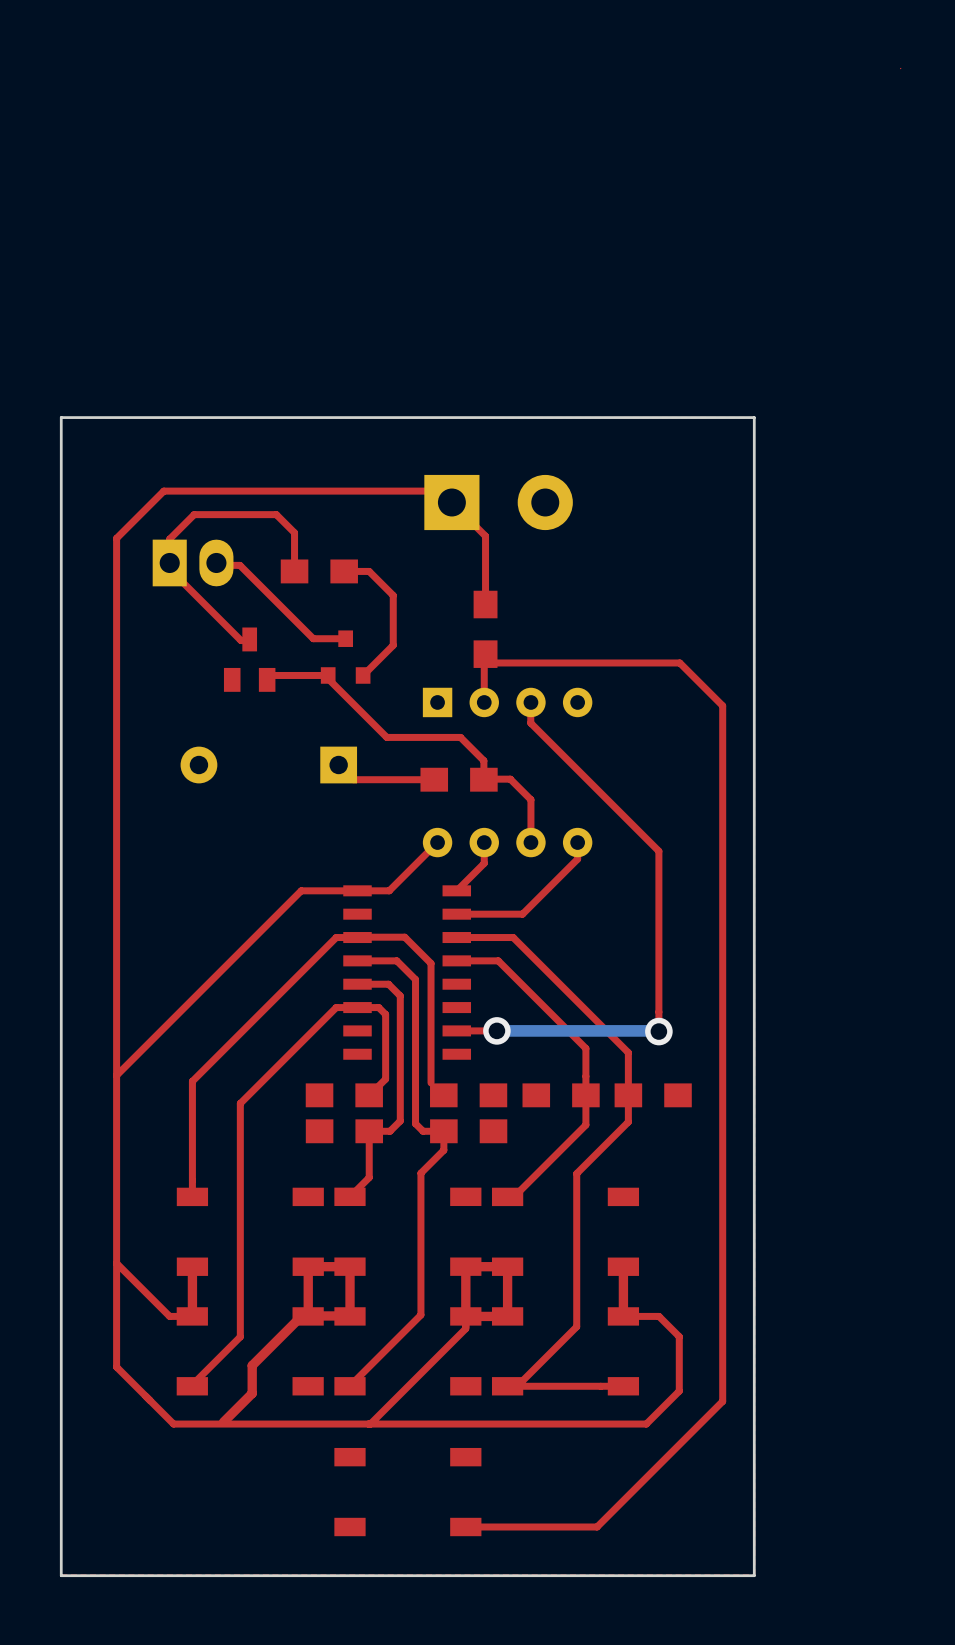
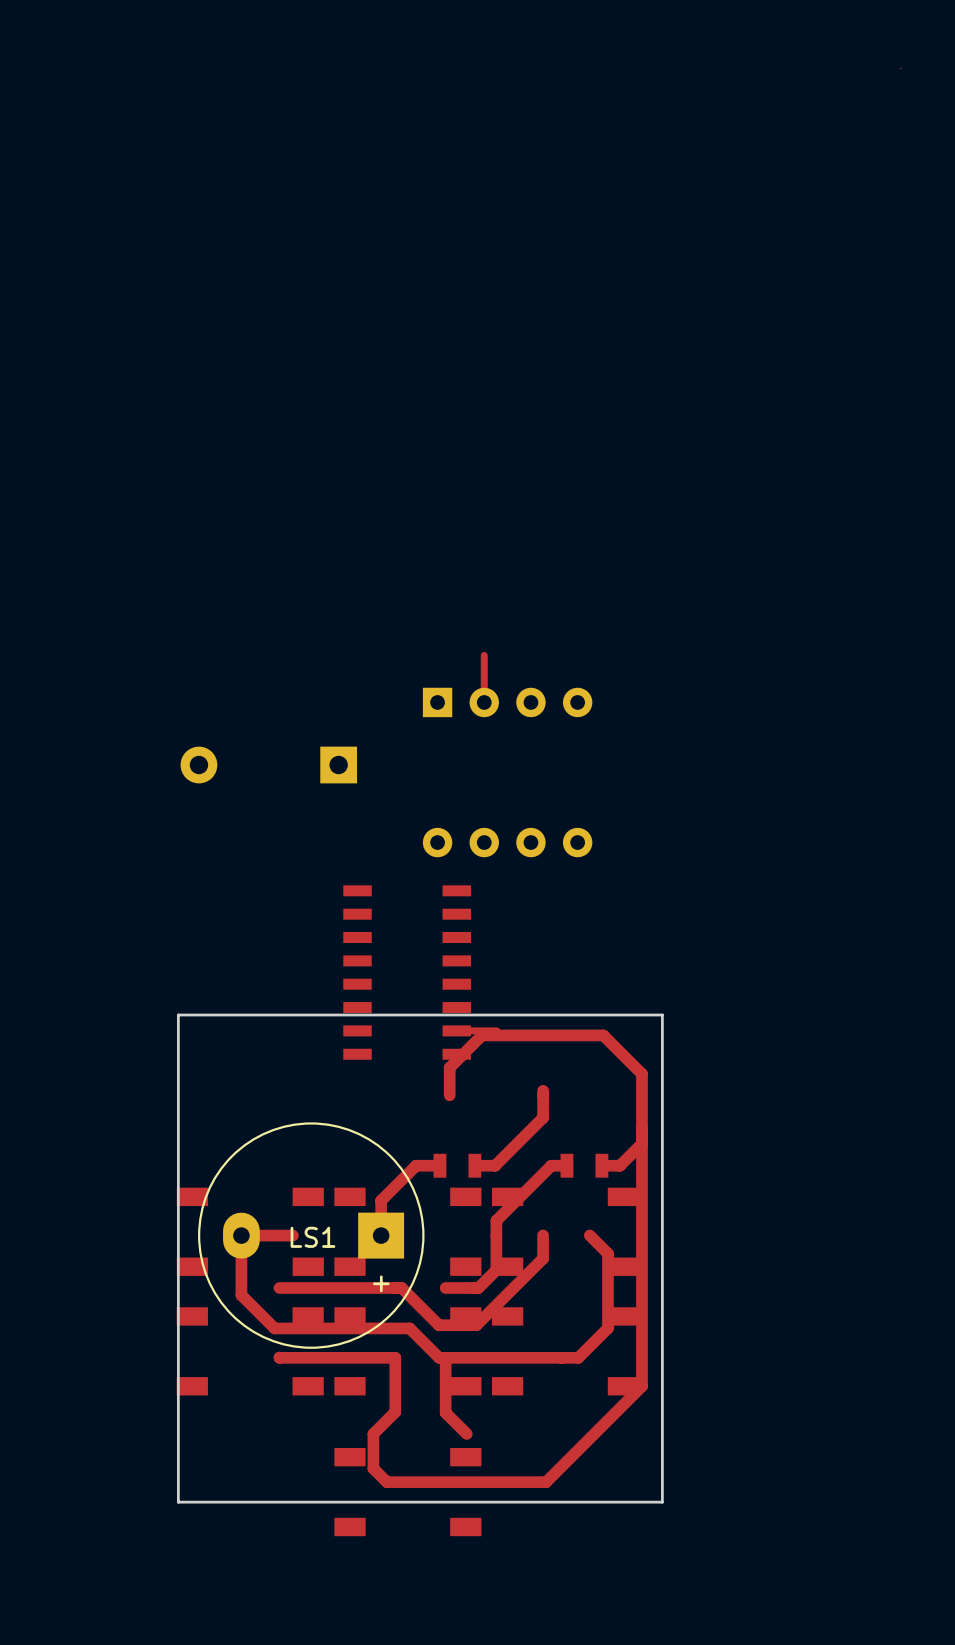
board edge: (754, 417) (754, 1575) (61, 1575) (61, 417) (754, 417) -> none
part: (498, 502) -> none
part: (193, 562) -> none
top track: (214, 565) (239, 565) (313, 638) (345, 638) -> none
top track: (294, 571) (294, 532) (276, 514) (194, 514) (169, 539) (169, 569) (241, 640) (250, 640) -> none
part: (319, 571) -> none
top track: (344, 571) (369, 571) (393, 595) (393, 645) (363, 675) -> none
top track: (485, 604) (485, 536) (440, 491) (163, 491) (116, 538) (116, 1367) (173, 1424) (646, 1424) (679, 1391) (679, 1336) (659, 1316) (623, 1316) (623, 1266) -> none
part: (485, 629) -> none
top track: (484, 655) (491, 662) (679, 662) (722, 705) (722, 1401) (597, 1527) (465, 1527) -> none
part: (345, 657) -> none
part: (249, 659) -> none
top track: (267, 679) (271, 675) (328, 675) (328, 678) (386, 737) (460, 737) (483, 760) (483, 779) (475, 779) -> none
top track: (530, 703) (530, 723) (658, 851) (658, 1031) -> none
top track: (338, 765) (353, 779) (434, 779) -> none
part: (459, 779) -> none
top track: (482, 779) (510, 779) (530, 799) (530, 842) -> none
top track: (437, 842) (389, 890) (301, 890) (116, 1075) -> none
top track: (484, 842) (484, 863) (456, 890) -> none
top track: (577, 842) (577, 859) (522, 914) (456, 914) -> none
top track: (356, 937) (404, 937) (431, 963) (431, 1082) -> none
top track: (357, 937) (336, 937) (192, 1081) (192, 1196) -> none
top track: (456, 937) (513, 937) (628, 1052) (628, 1122) (576, 1173) (576, 1326) (517, 1386) -> none
top track: (357, 960) (396, 960) (415, 979) (415, 1123) (423, 1131) (443, 1131) (443, 1150) (420, 1173) (420, 1315) (350, 1385) -> none
top track: (456, 960) (498, 960) (585, 1048) (585, 1125) (514, 1196) (507, 1196) -> none
top track: (357, 984) (388, 984) (400, 995) (400, 1121) (390, 1131) (369, 1131) (369, 1177) (349, 1196) (346, 1196) -> none
board edge: none -> (662, 1015) (662, 1502) (178, 1502) (178, 1015) (662, 1015)
bottom track: (496, 1030) (658, 1031) -> none
via: (496, 1030) -> none
via: (658, 1031) -> none
top track: none -> (543, 1090) (543, 1117) (495, 1165) (474, 1165)
part: (344, 1095) -> none
top track: (369, 1095) (385, 1079) (385, 1014) (378, 1007) (336, 1007) (240, 1103) (240, 1336) (192, 1386) -> none
top track: none -> (449, 1095) (449, 1067) (482, 1035) (603, 1035) (641, 1074) (641, 1386) (546, 1482) (386, 1482) (373, 1468) (373, 1433) (395, 1412) (395, 1357) (279, 1357)
part: (468, 1095) -> none
part: (561, 1095) -> none
part: (653, 1095) -> none
part: (344, 1131) -> none
part: (468, 1131) -> none
top track: none -> (641, 1143) (620, 1165) (601, 1165)
top track: none -> (439, 1165) (416, 1165) (381, 1200) (381, 1234)
part: none -> (457, 1165)
top track: none -> (566, 1165) (551, 1165) (496, 1220) (496, 1270) (478, 1287) (445, 1287)
part: none -> (584, 1165)
LS1: none -> (311, 1235)
top track: none -> (543, 1235) (543, 1258) (476, 1325) (438, 1325) (401, 1287) (279, 1287)
top track: none -> (589, 1235) (607, 1253) (607, 1328) (578, 1357) (439, 1357) (409, 1328) (274, 1328) (241, 1295) (241, 1235) (292, 1235)
top track: (116, 1263) (169, 1316) (192, 1316) -> none
top track: (192, 1266) (192, 1315) -> none
top track: (308, 1266) (349, 1266) (350, 1315) (301, 1315) (252, 1365) (252, 1393) (223, 1422) -> none
top track: (308, 1266) (308, 1315) -> none
top track: (465, 1315) (465, 1328) (370, 1424) -> none
top track: (465, 1315) (507, 1316) (507, 1266) (465, 1266) (465, 1315) -> none
top track: none -> (445, 1357) (445, 1412) (466, 1433)
top track: (623, 1386) (507, 1386) -> none

